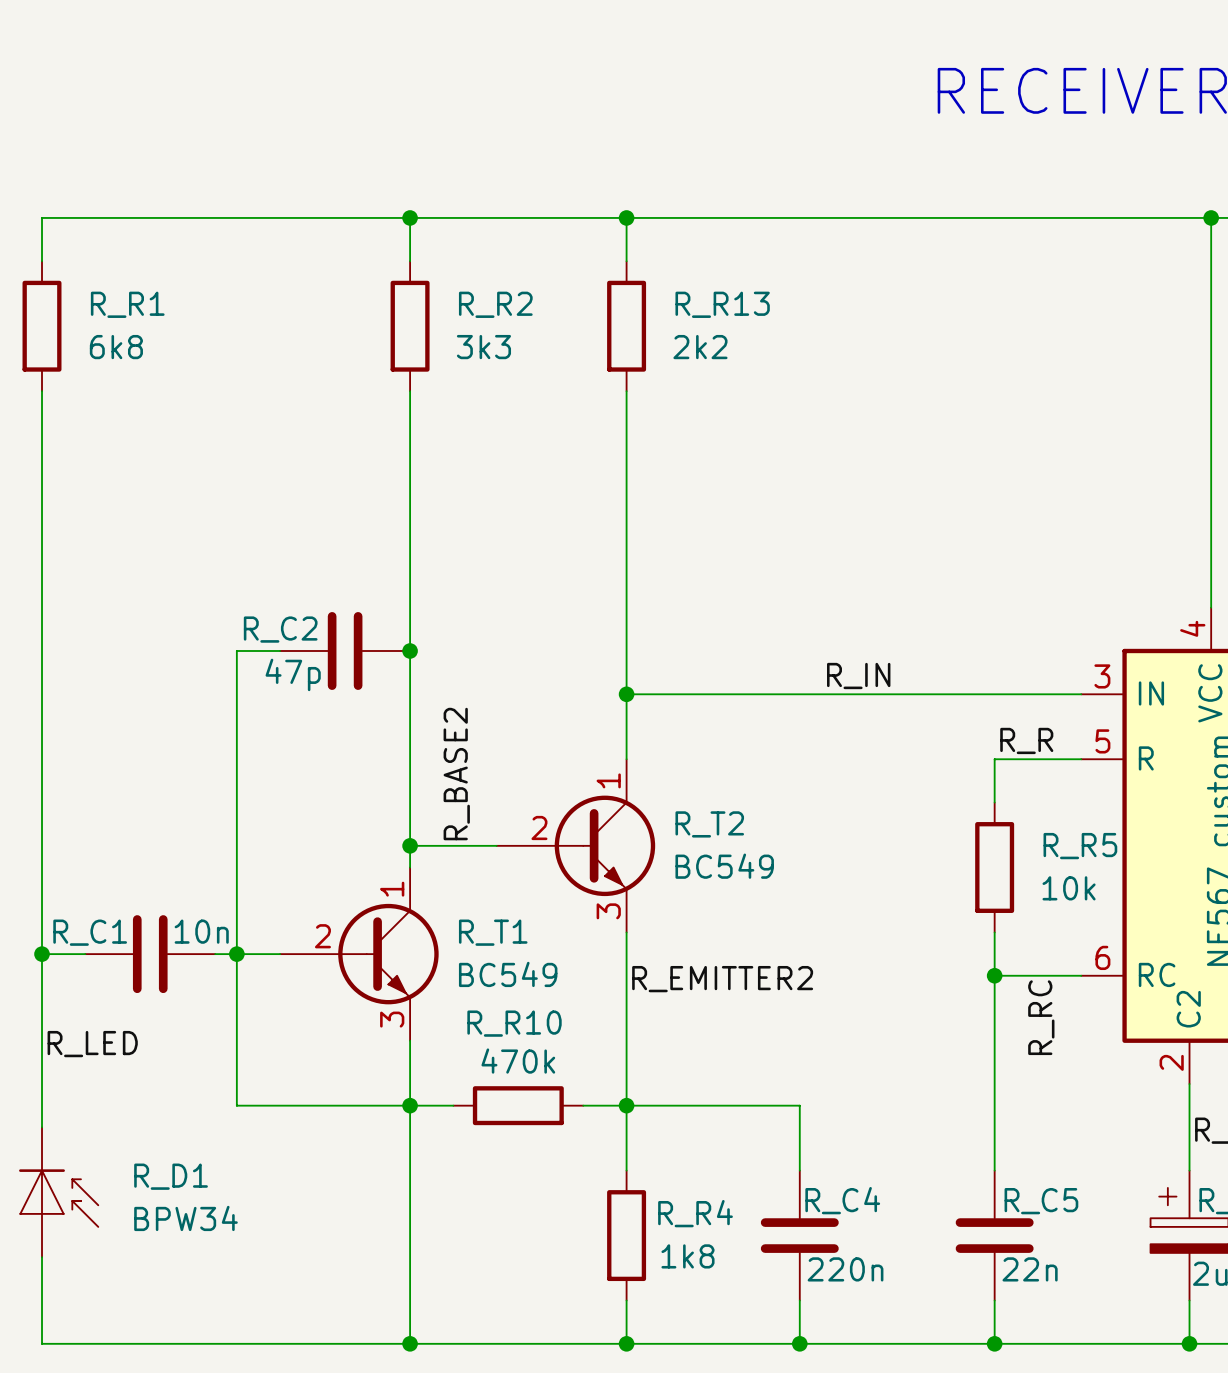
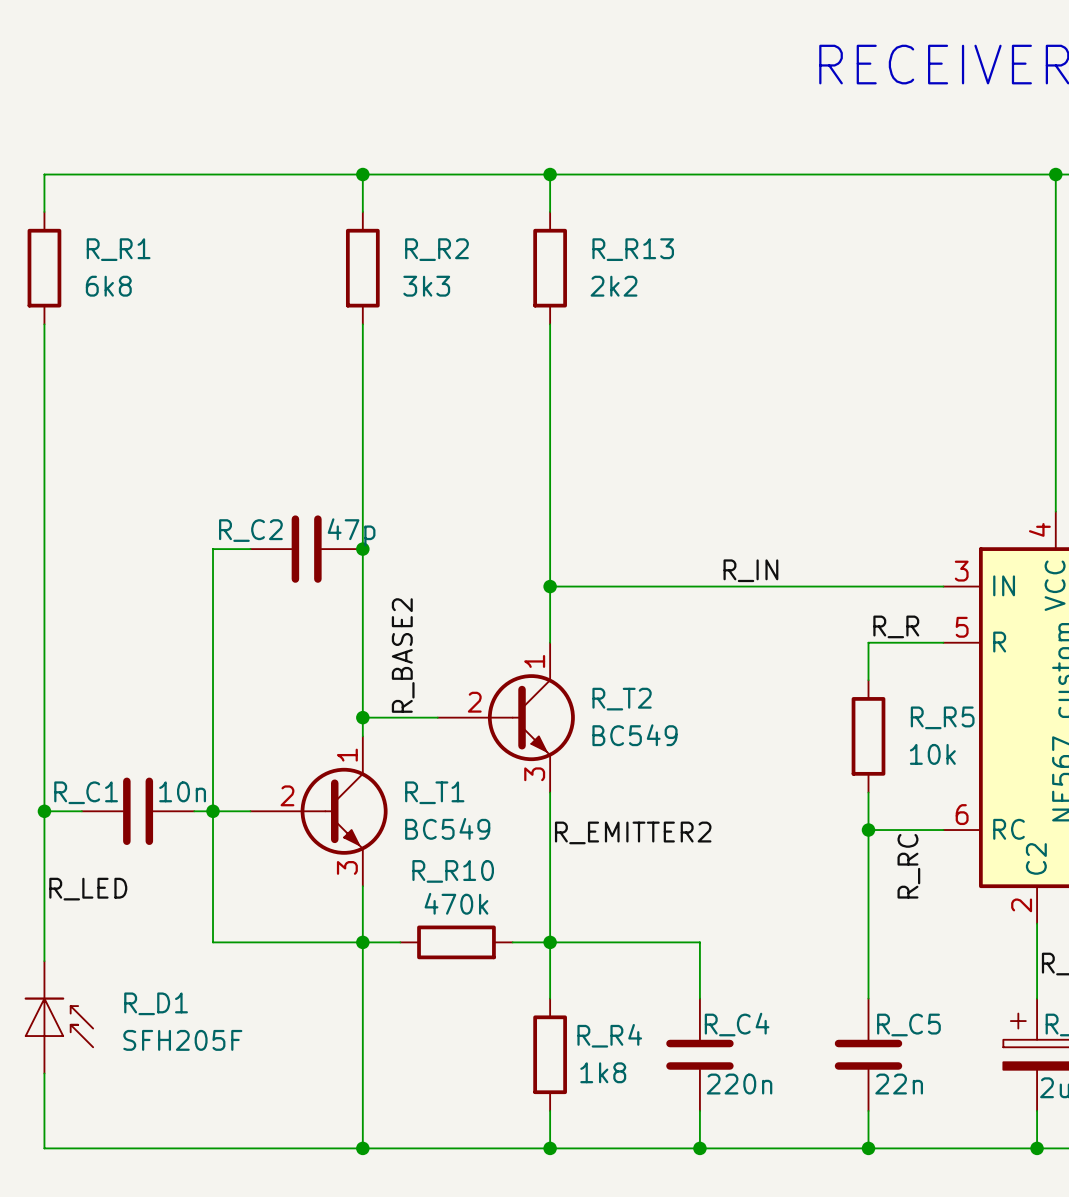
R_C2 value position: 47p (293, 674) -> 47p (351, 532)
R_D1 value: BPW34 (185, 1218) -> SFH205F (182, 1040)

